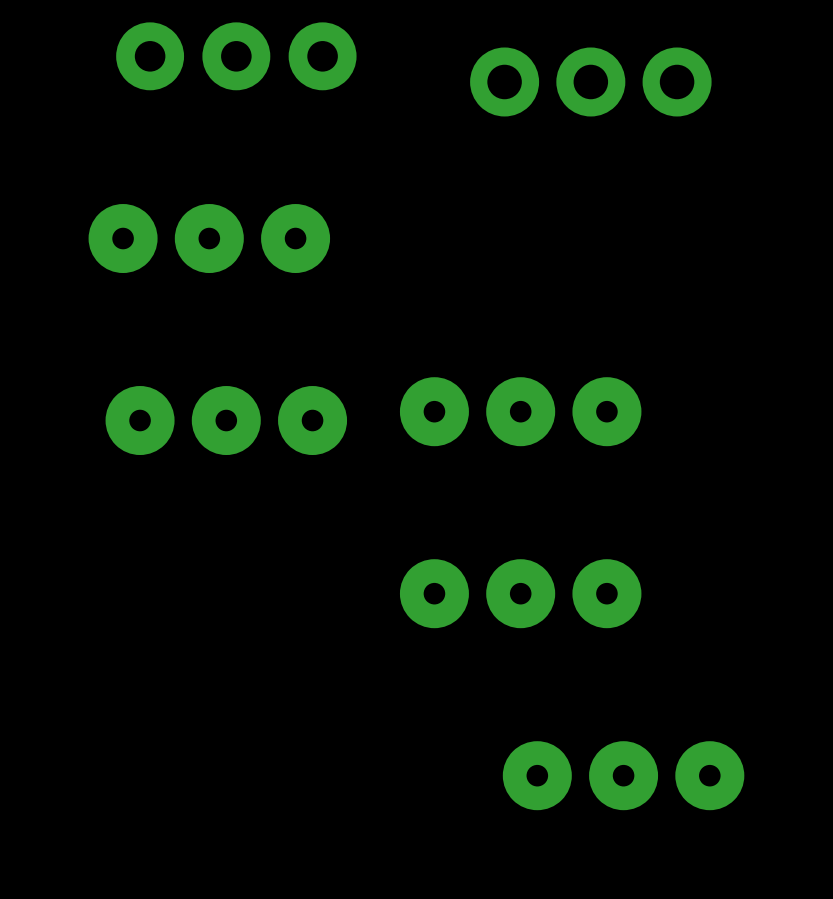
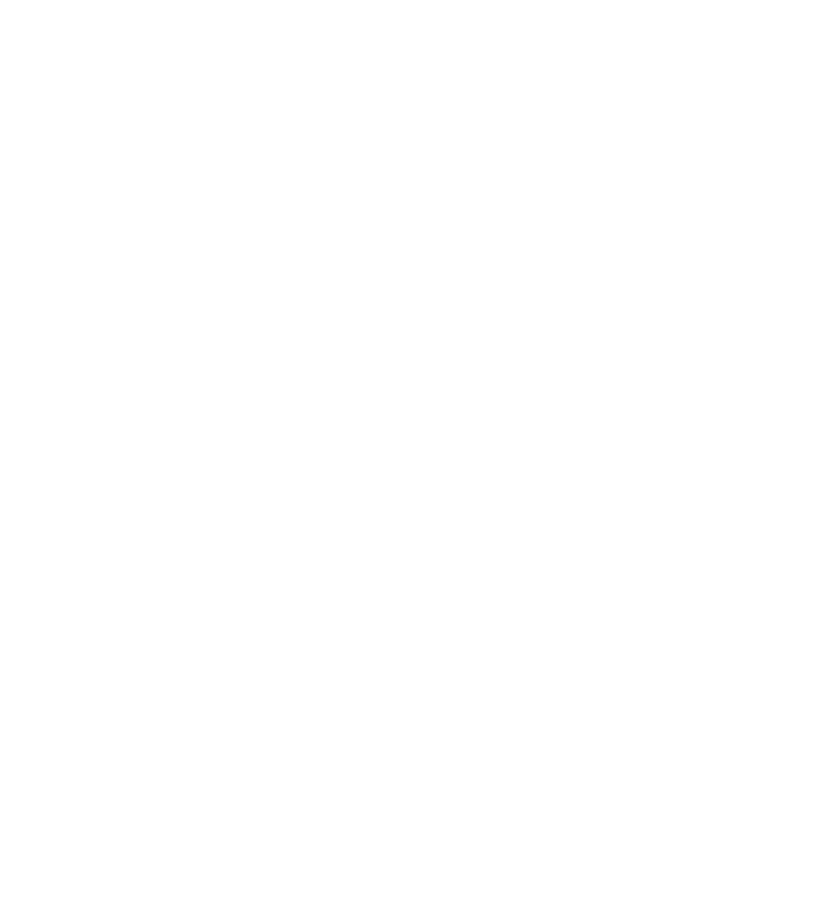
part: (236, 56) -> none
part: (590, 81) -> none
part: (209, 238) -> none
part: (520, 411) -> none
part: (226, 420) -> none
part: (520, 593) -> none
part: (623, 775) -> none

